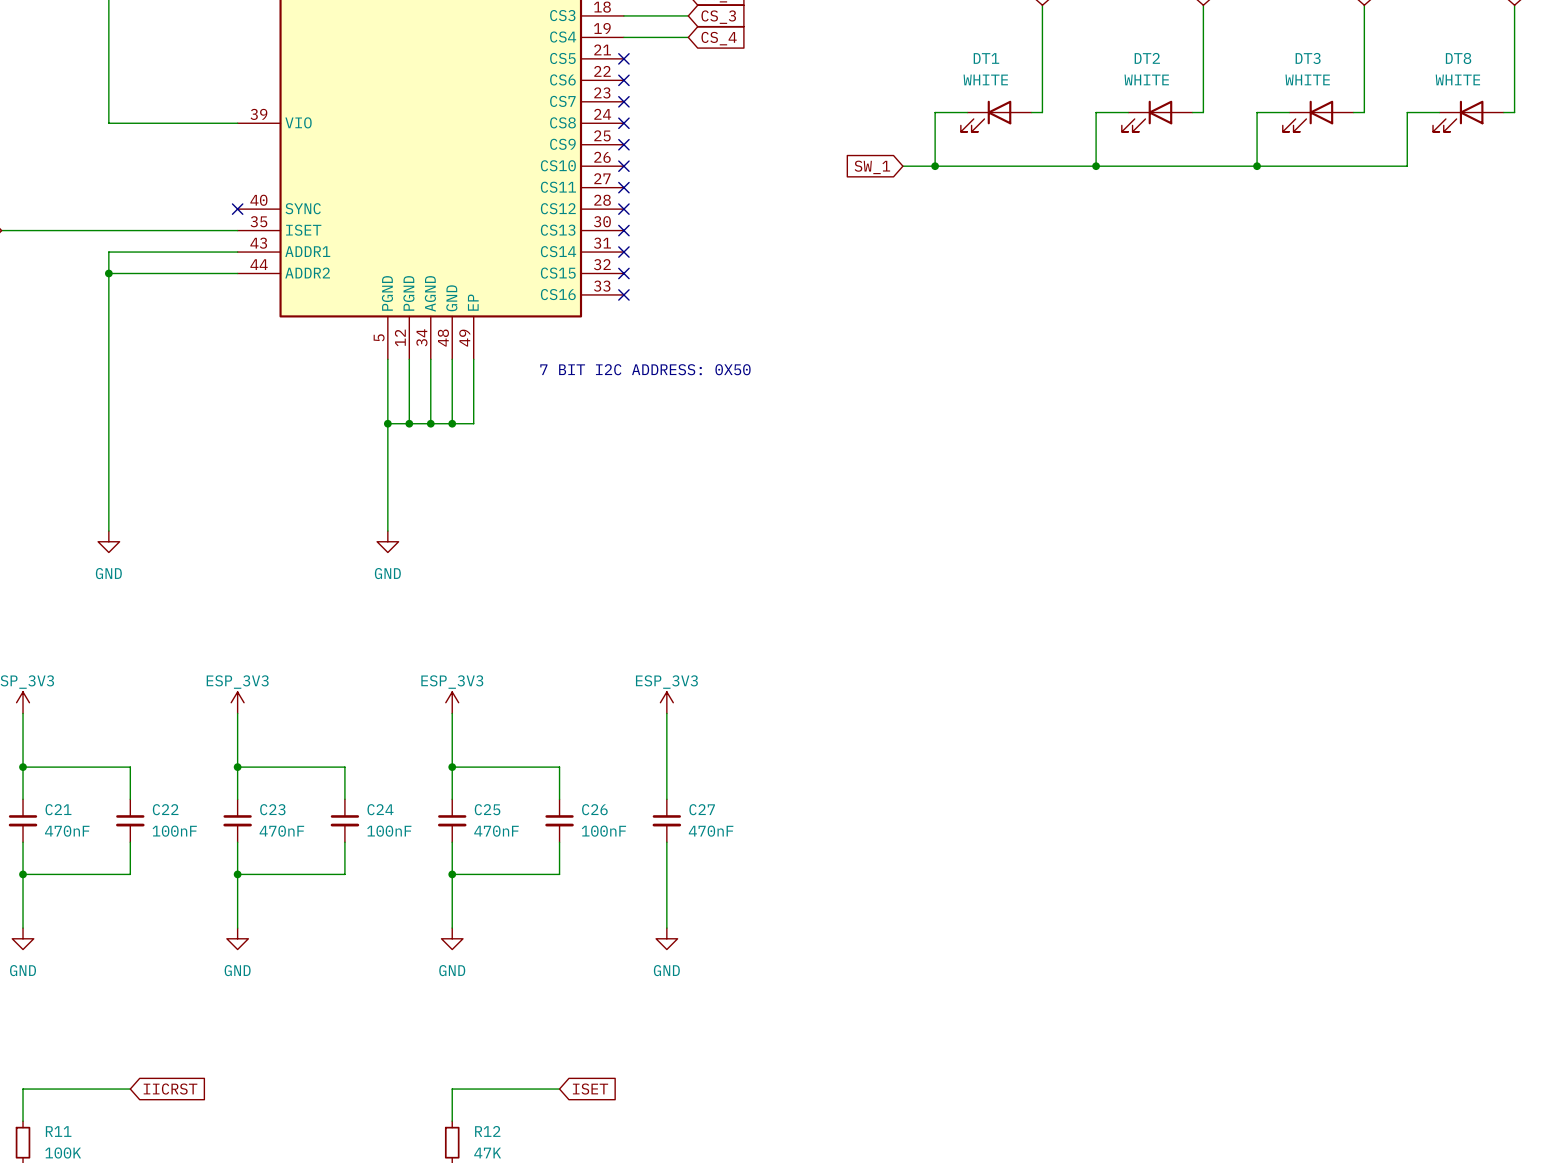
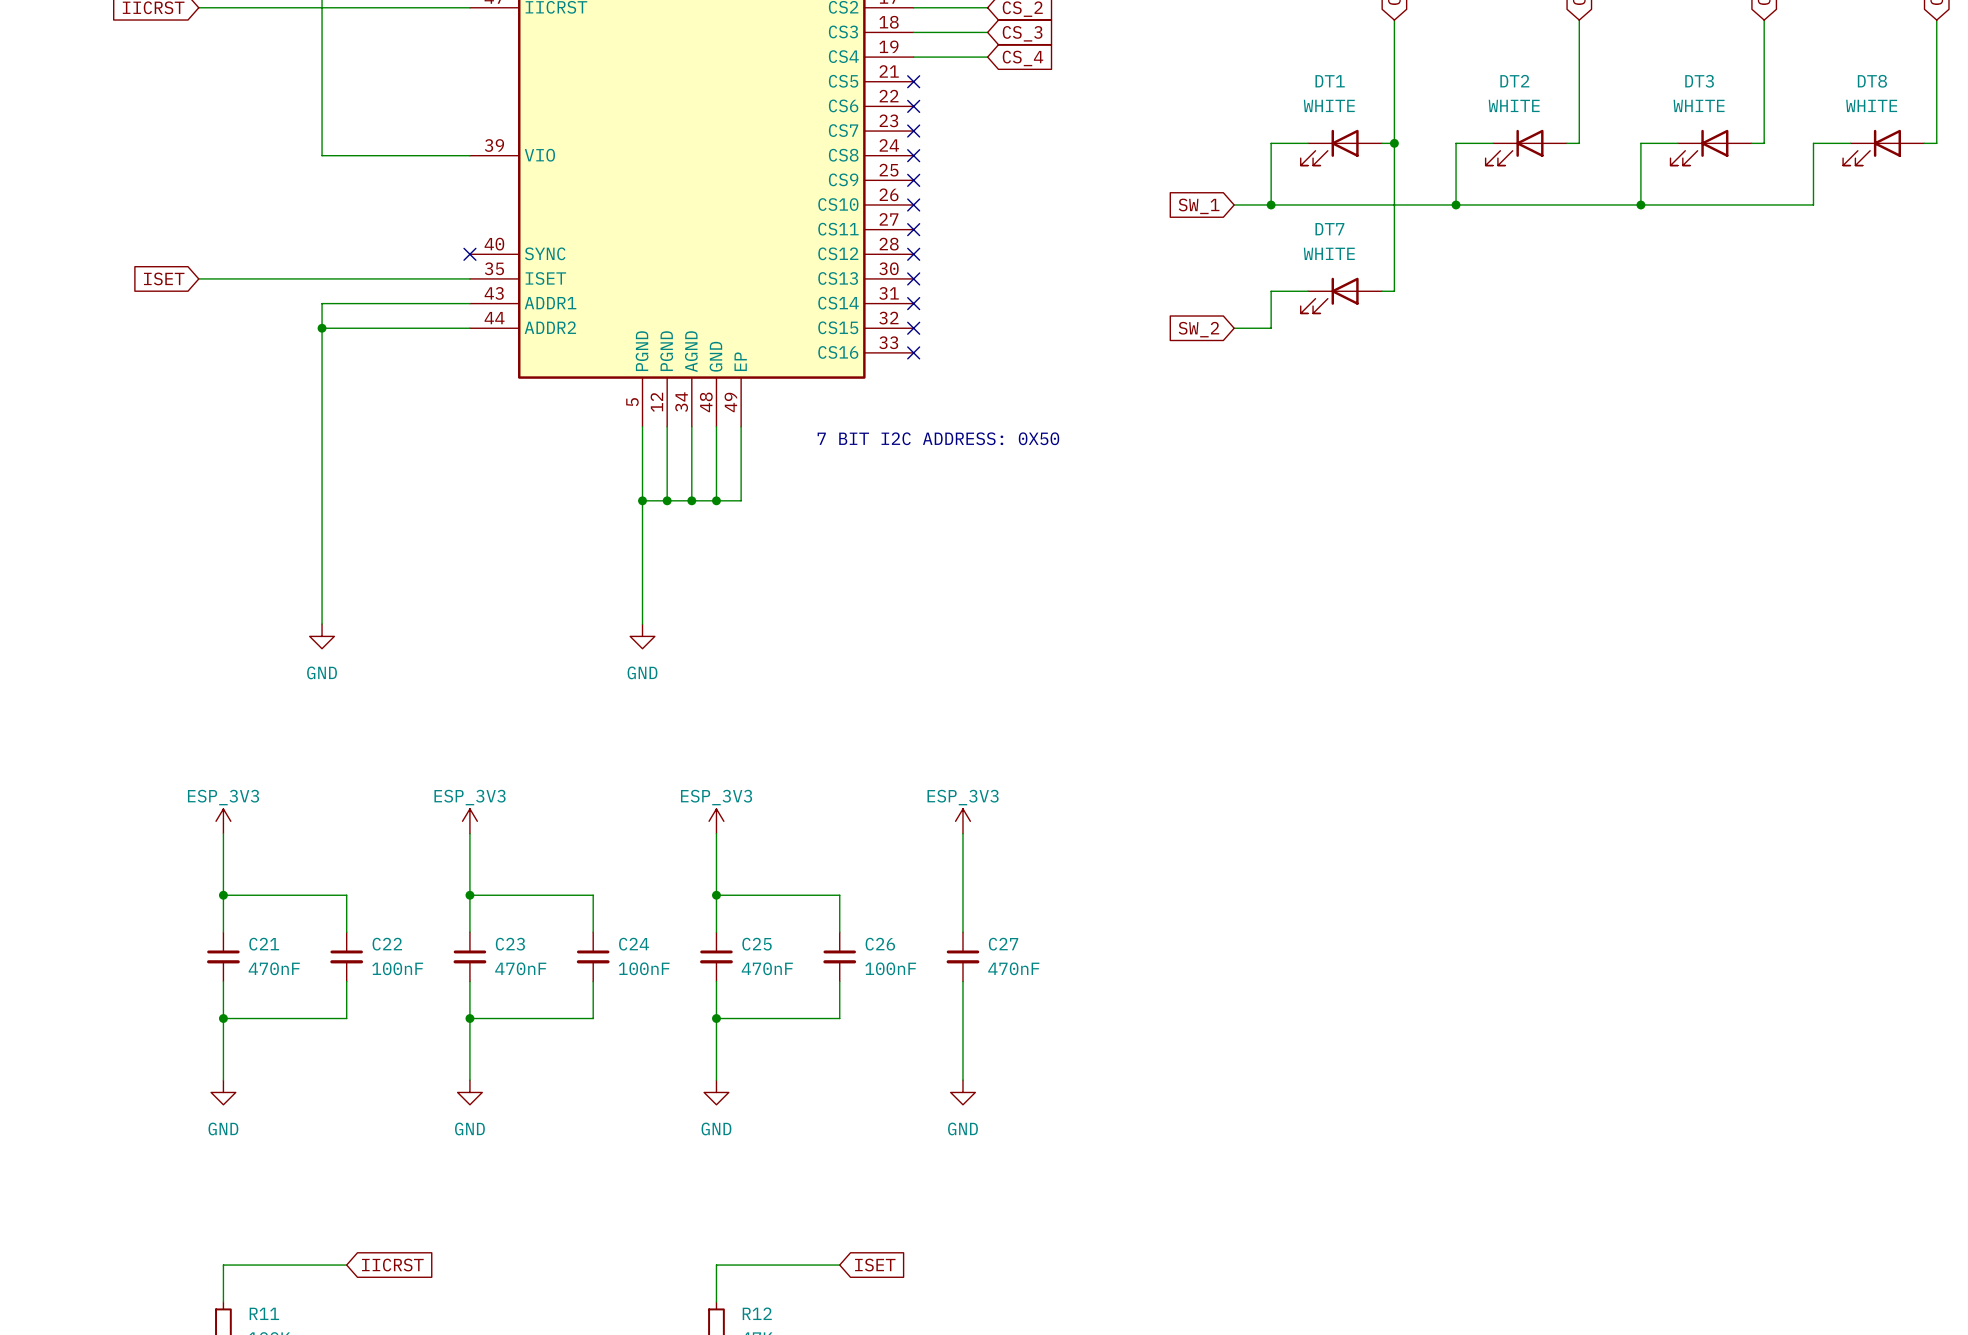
wire: none -> (1394, 143) (1394, 291) (1382, 291)
junction: none -> (1394, 143)
wire: none -> (1308, 291) (1271, 291) (1271, 328) (1234, 328)
DT7: none -> WHITE (1341, 295)
global label: none -> SW_2 (1198, 329)

